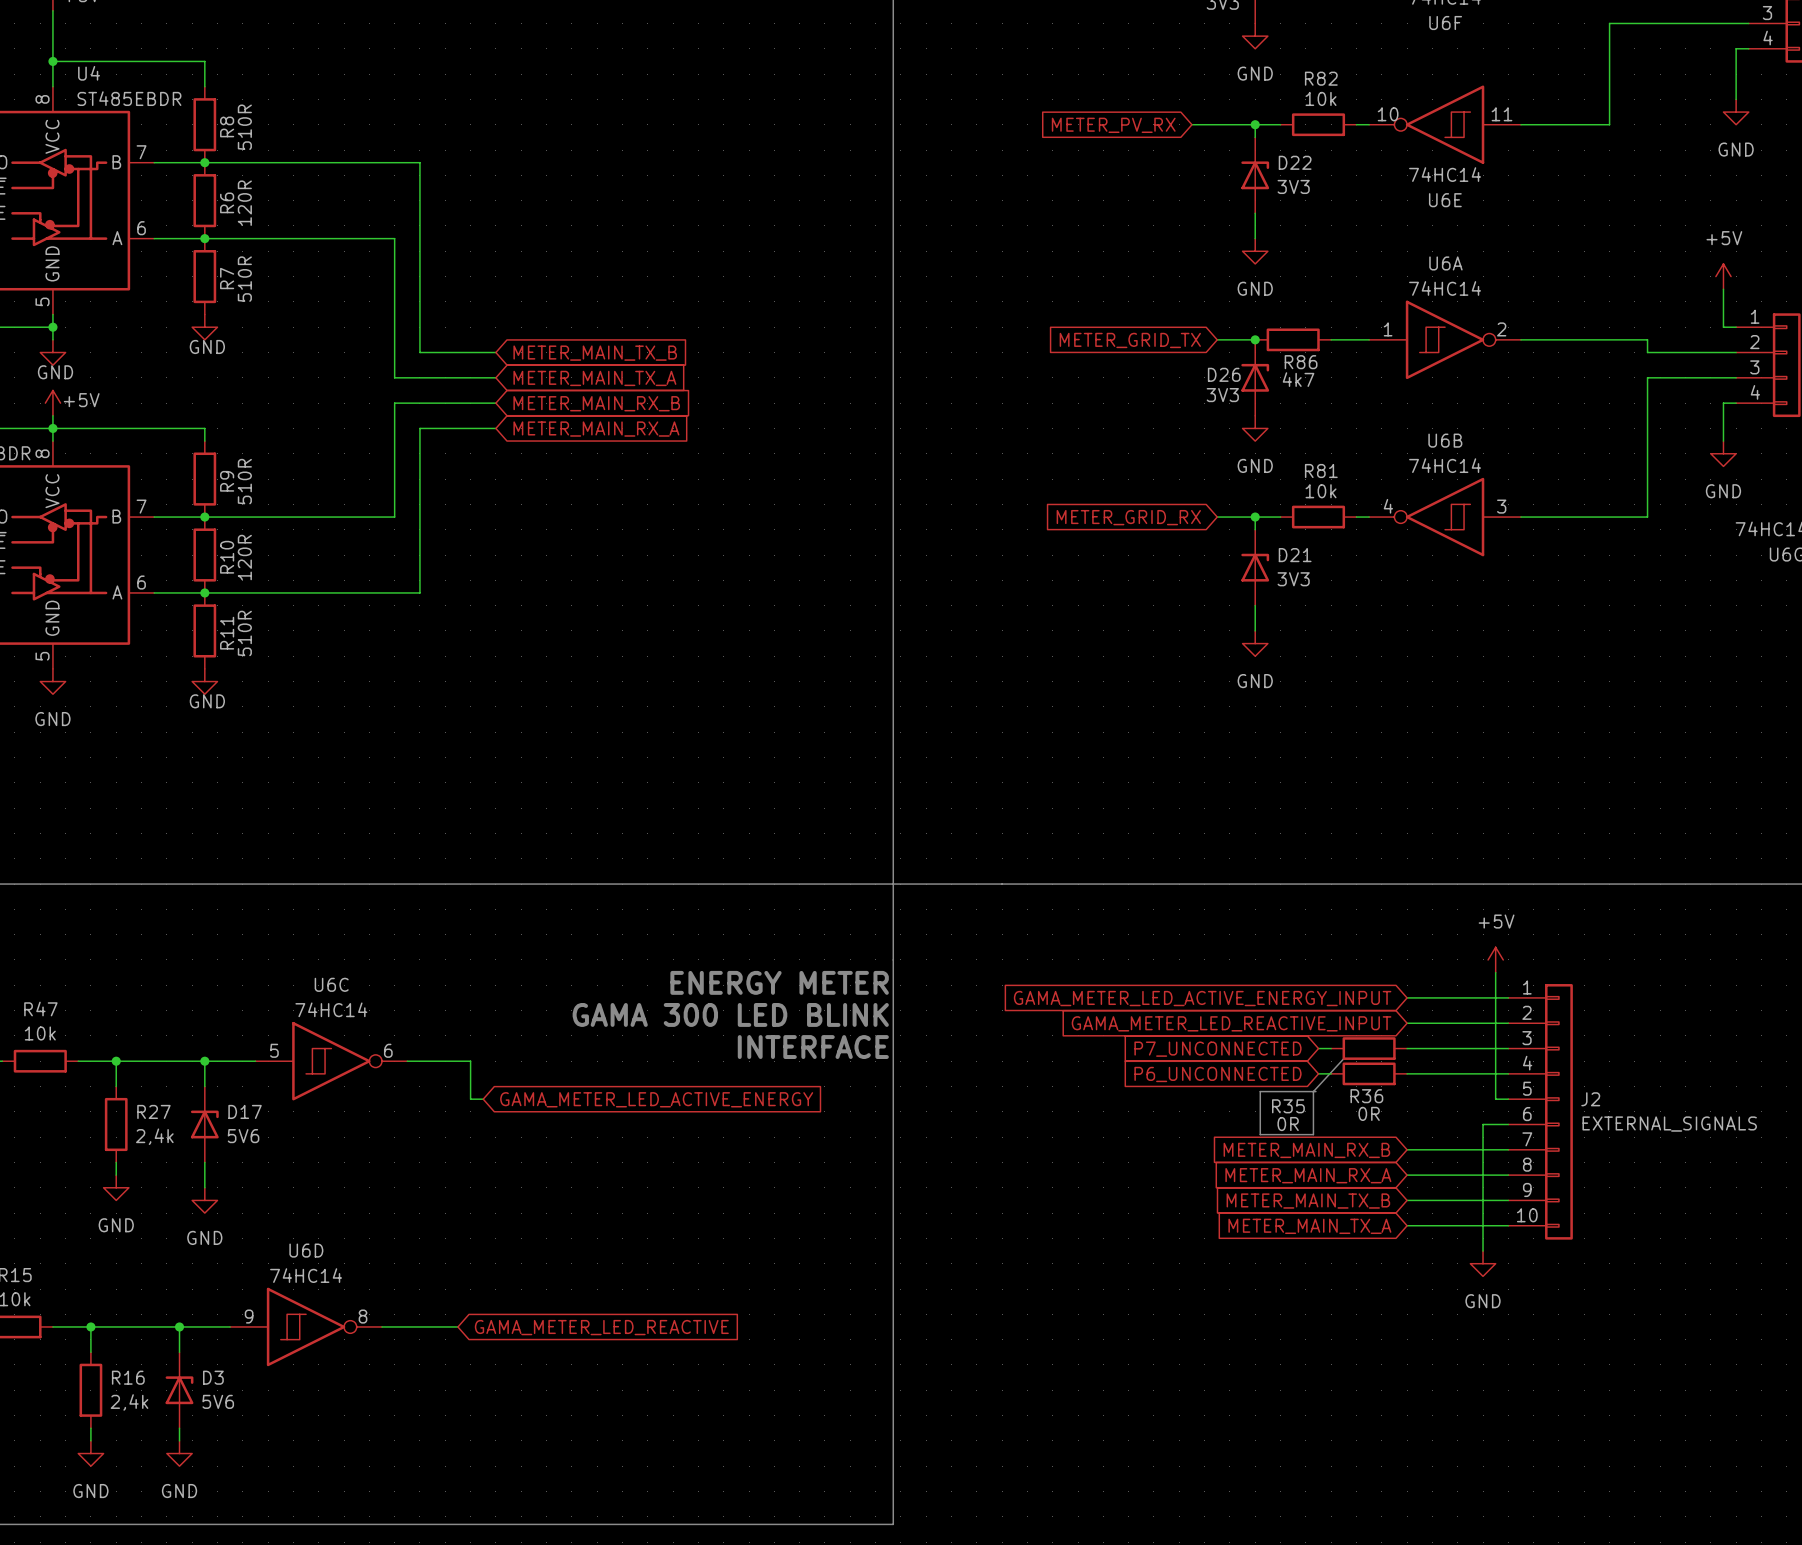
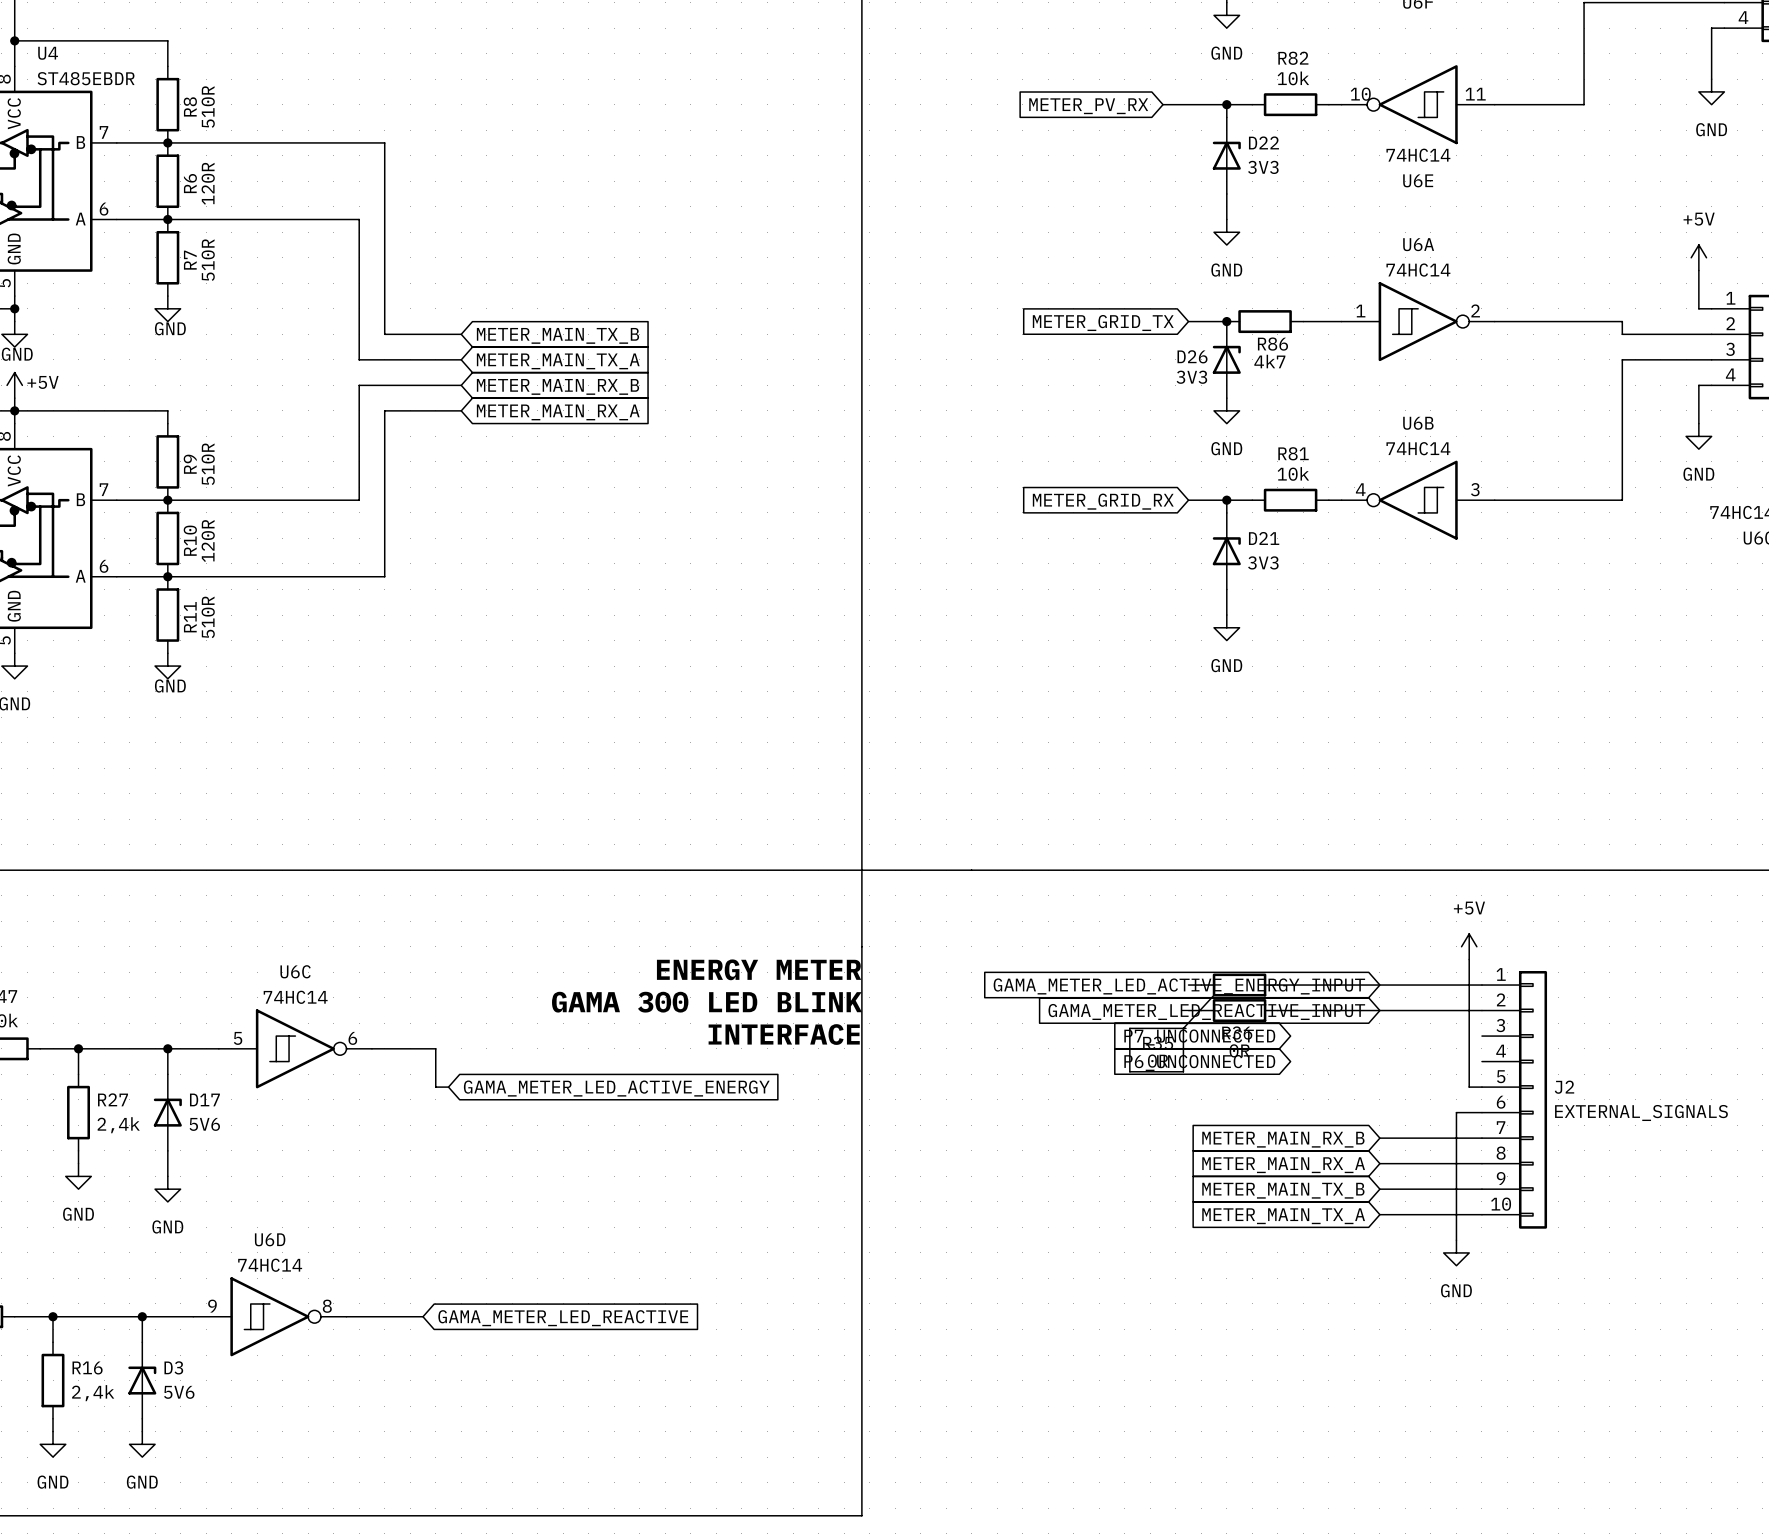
wire: (1318, 1048) (1331, 1048) -> (1188, 985) (1201, 985)
R35 position: (1369, 1048) -> (1239, 985)
wire: (1407, 1048) (1508, 1048) -> (1277, 985) (1379, 985)
line: (1343, 1058) (1313, 1091) (1313, 1134) (1260, 1134) (1260, 1091) (1315, 1091) -> (1214, 995) (1183, 1028) (1183, 1071) (1129, 1071) (1129, 1028) (1185, 1028)
wire: (1318, 1073) (1331, 1073) -> (1188, 1010) (1201, 1010)
R36 position: (1369, 1073) -> (1239, 1010)
wire: (1407, 1073) (1508, 1073) -> (1277, 1010) (1379, 1010)

